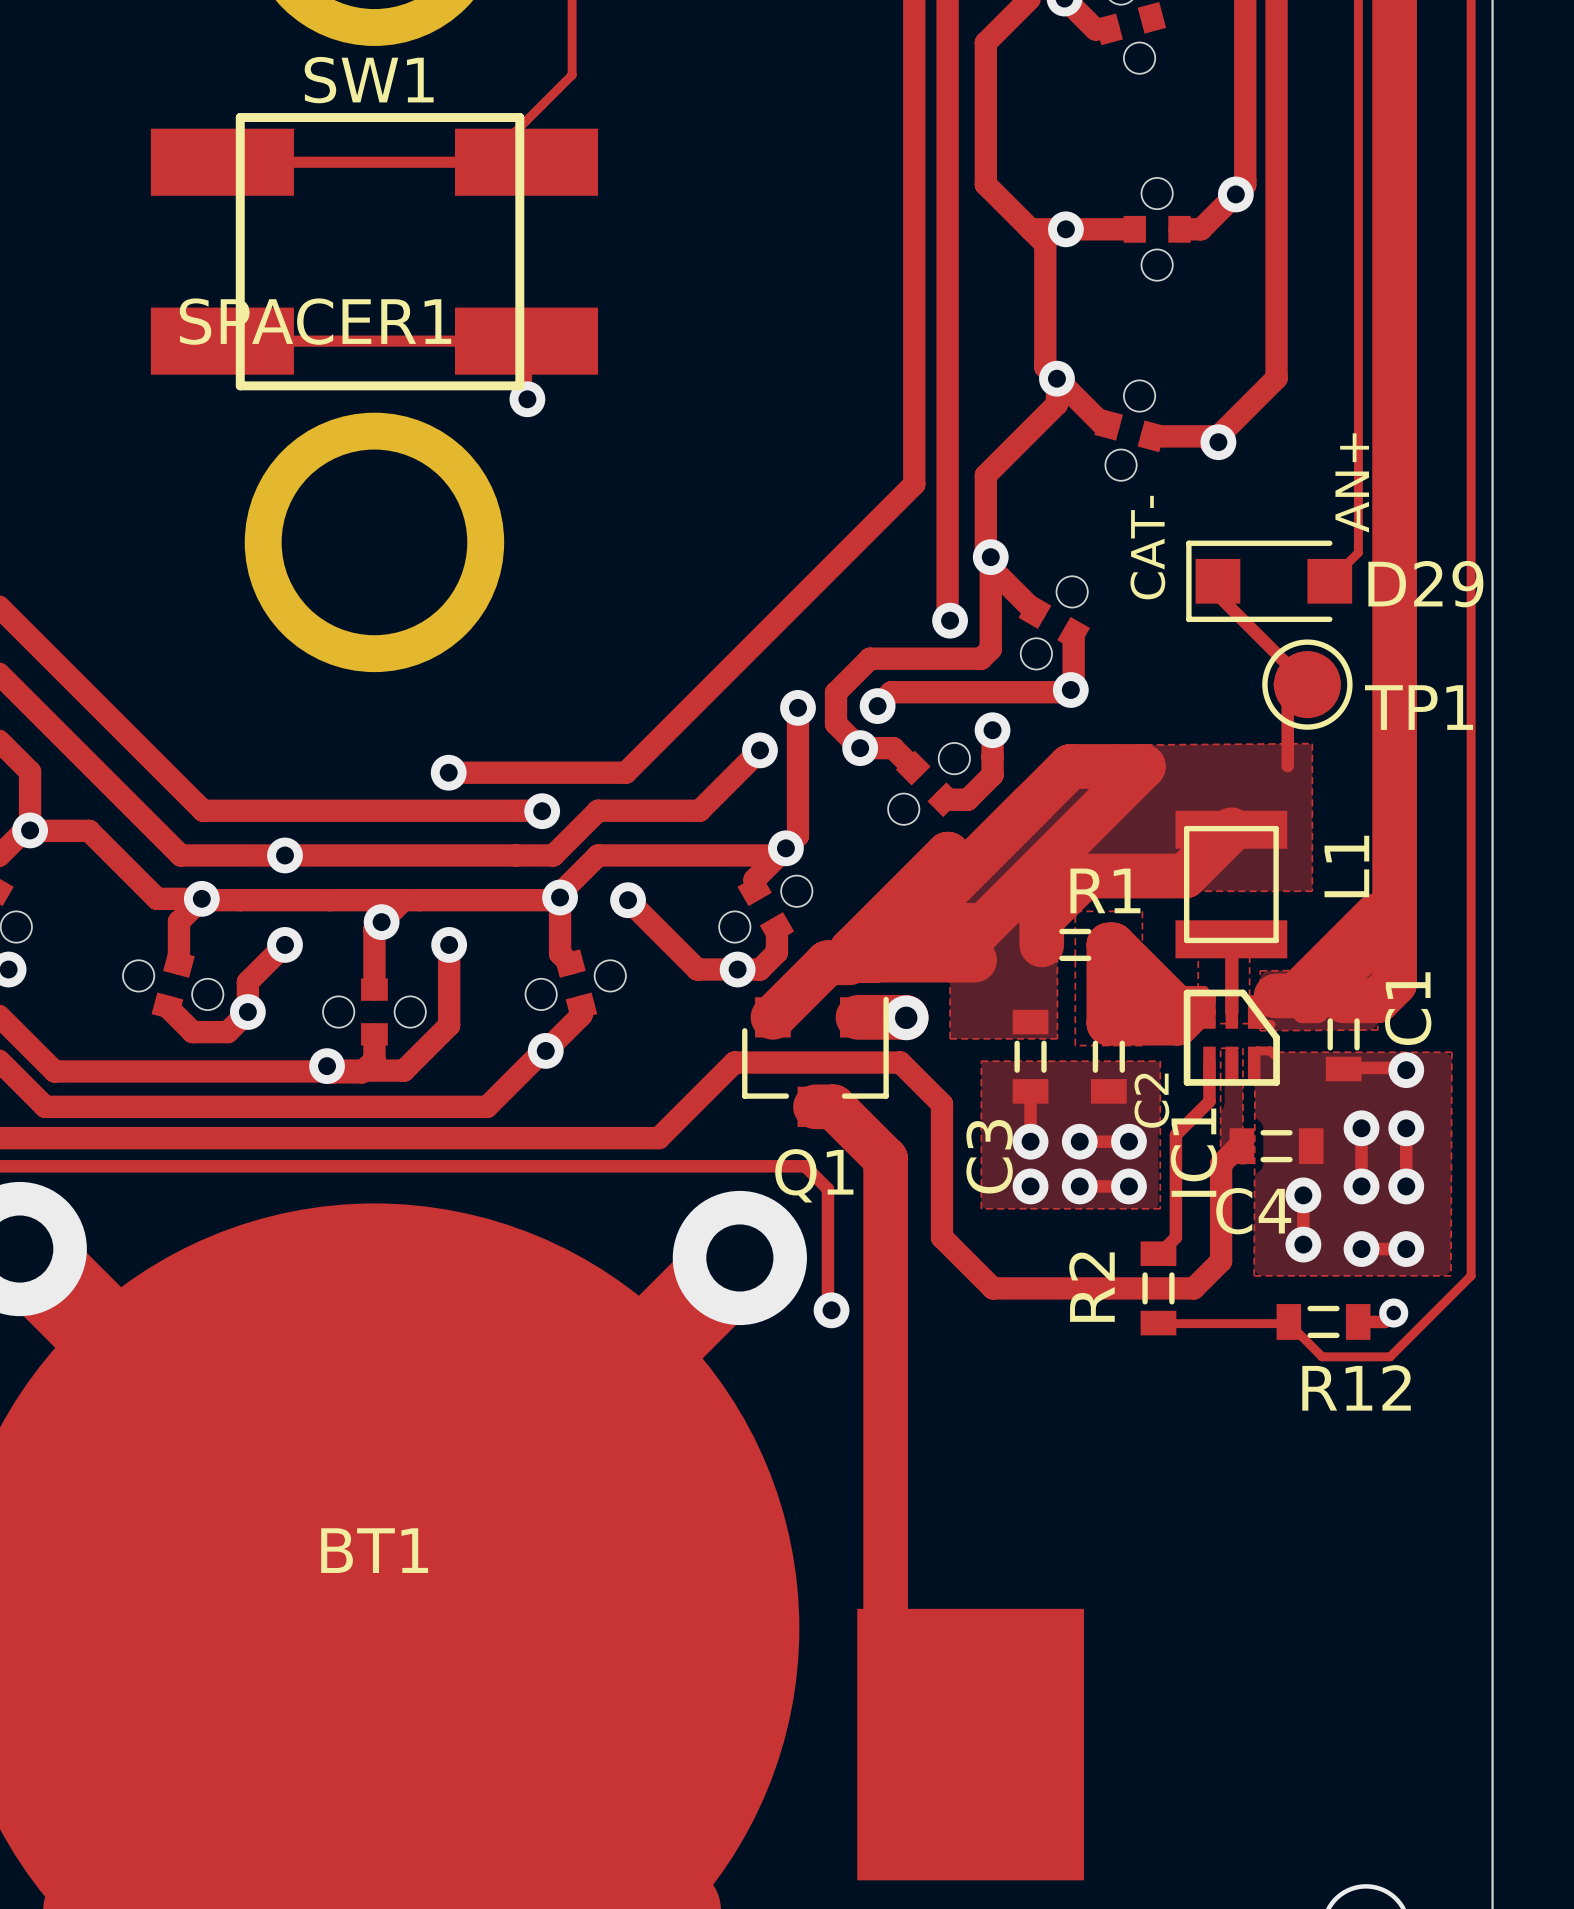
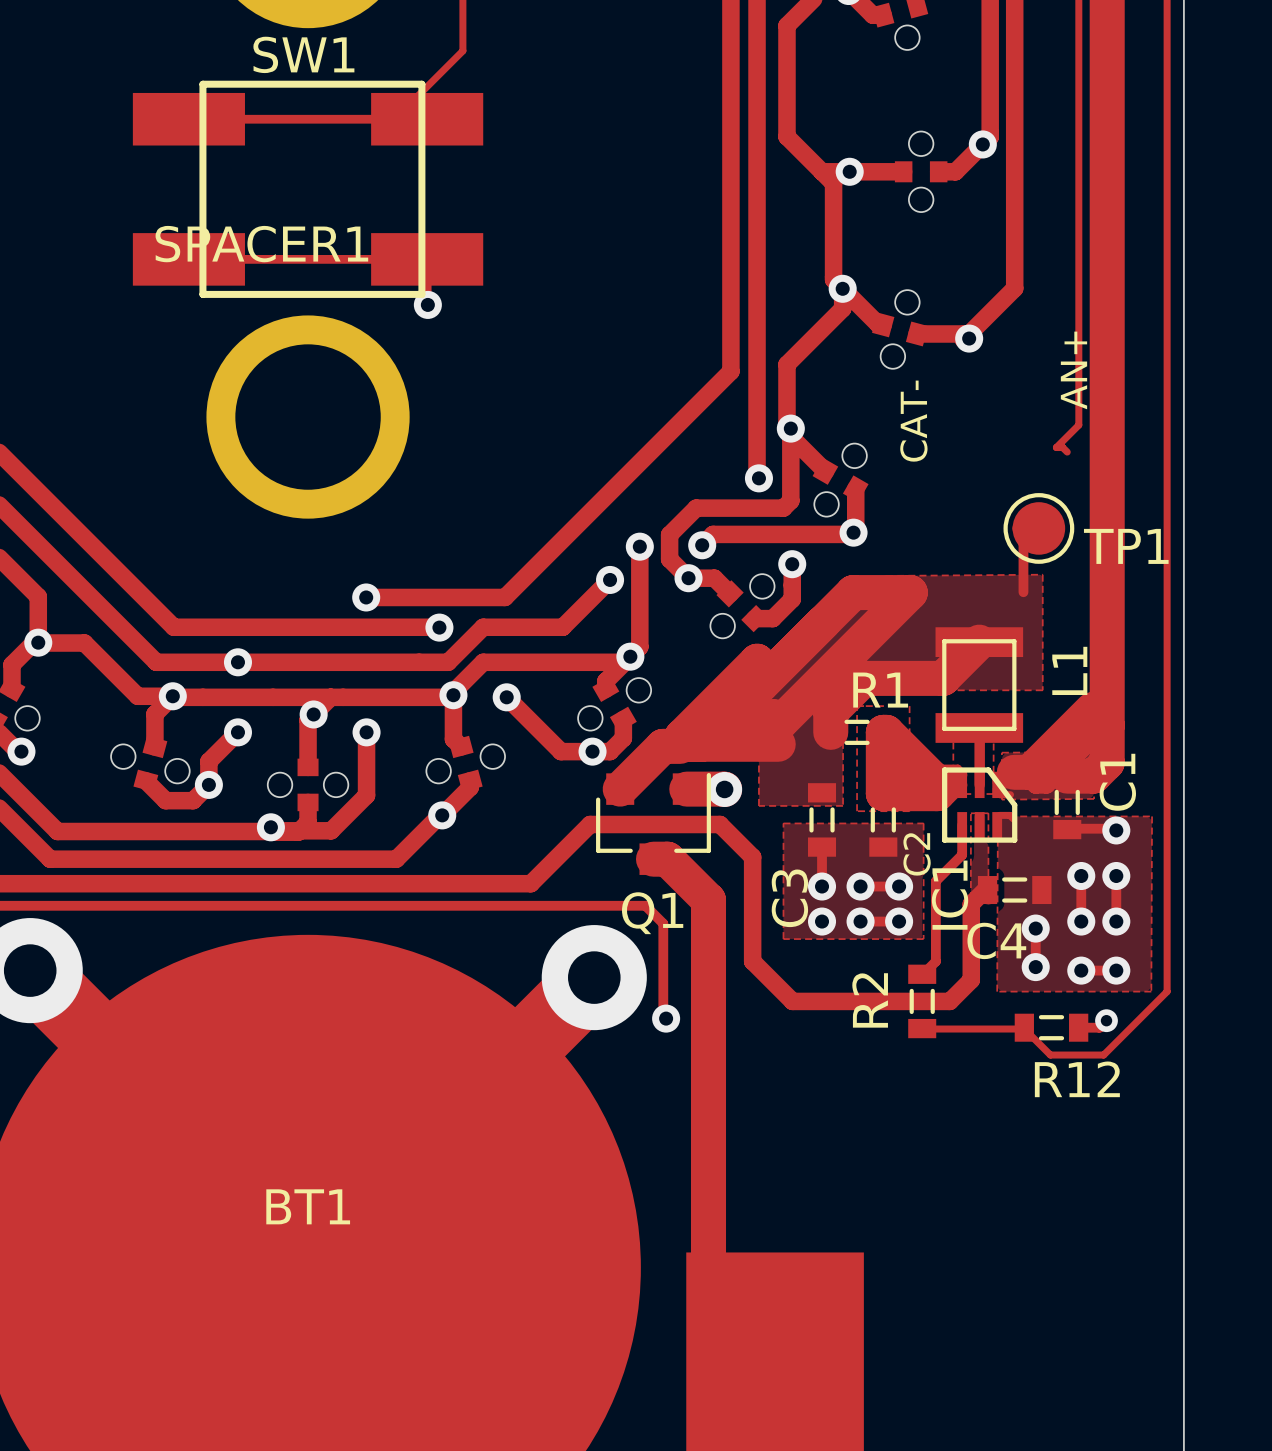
track: (1217, 581) (1217, 595) (1307, 684) -> none
D29: (1269, 581) -> none

